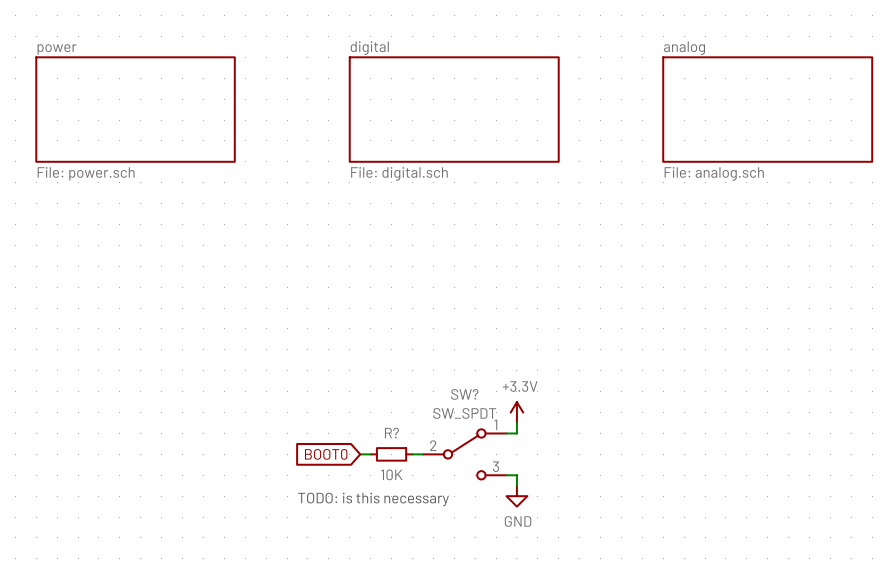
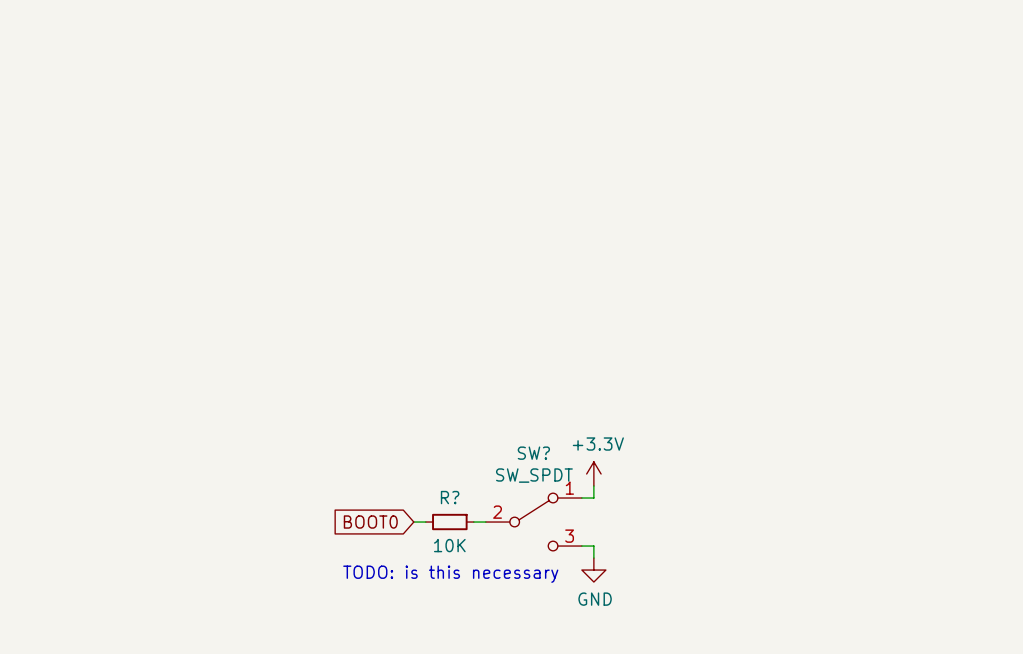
sheet power: File: power.sch (135, 109) -> none
sheet digital: File: digital.sch (454, 109) -> none
sheet analog: File: analog.sch (767, 109) -> none

